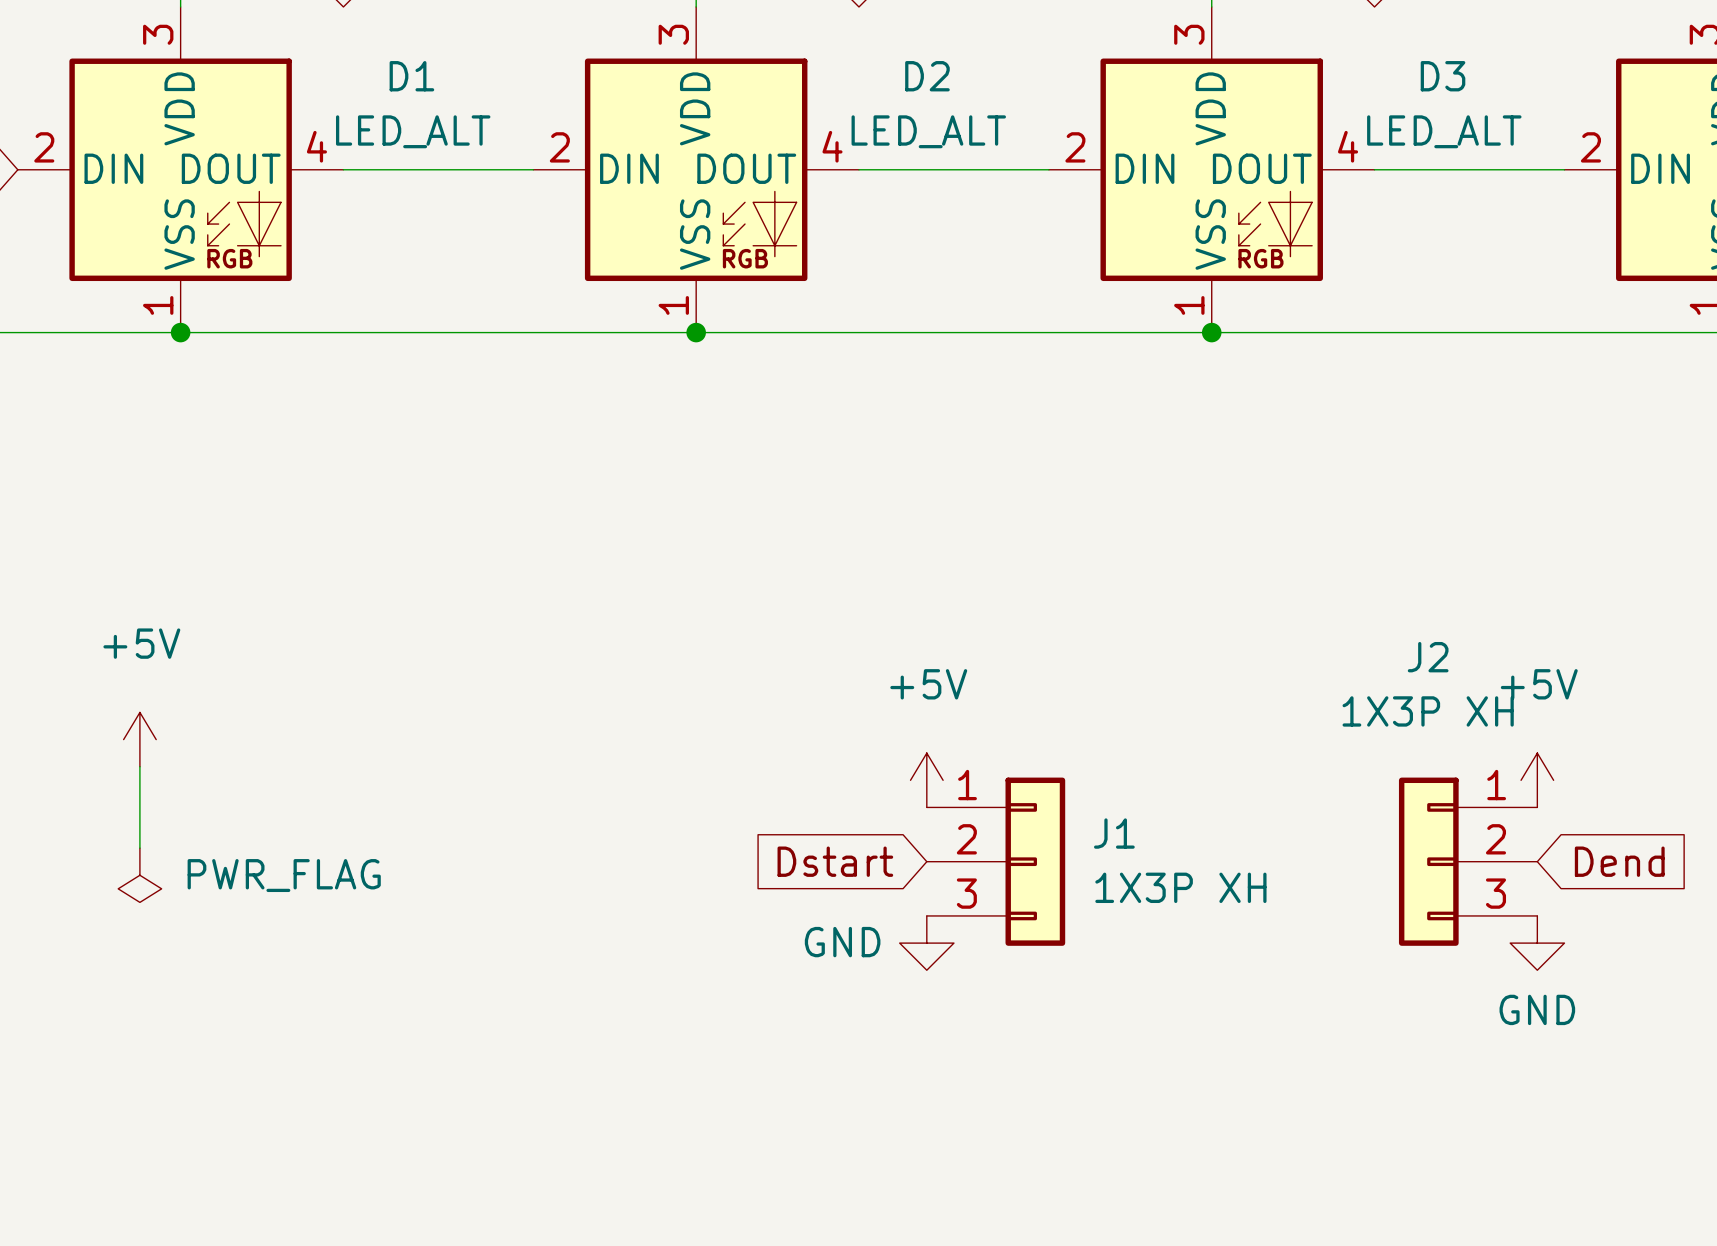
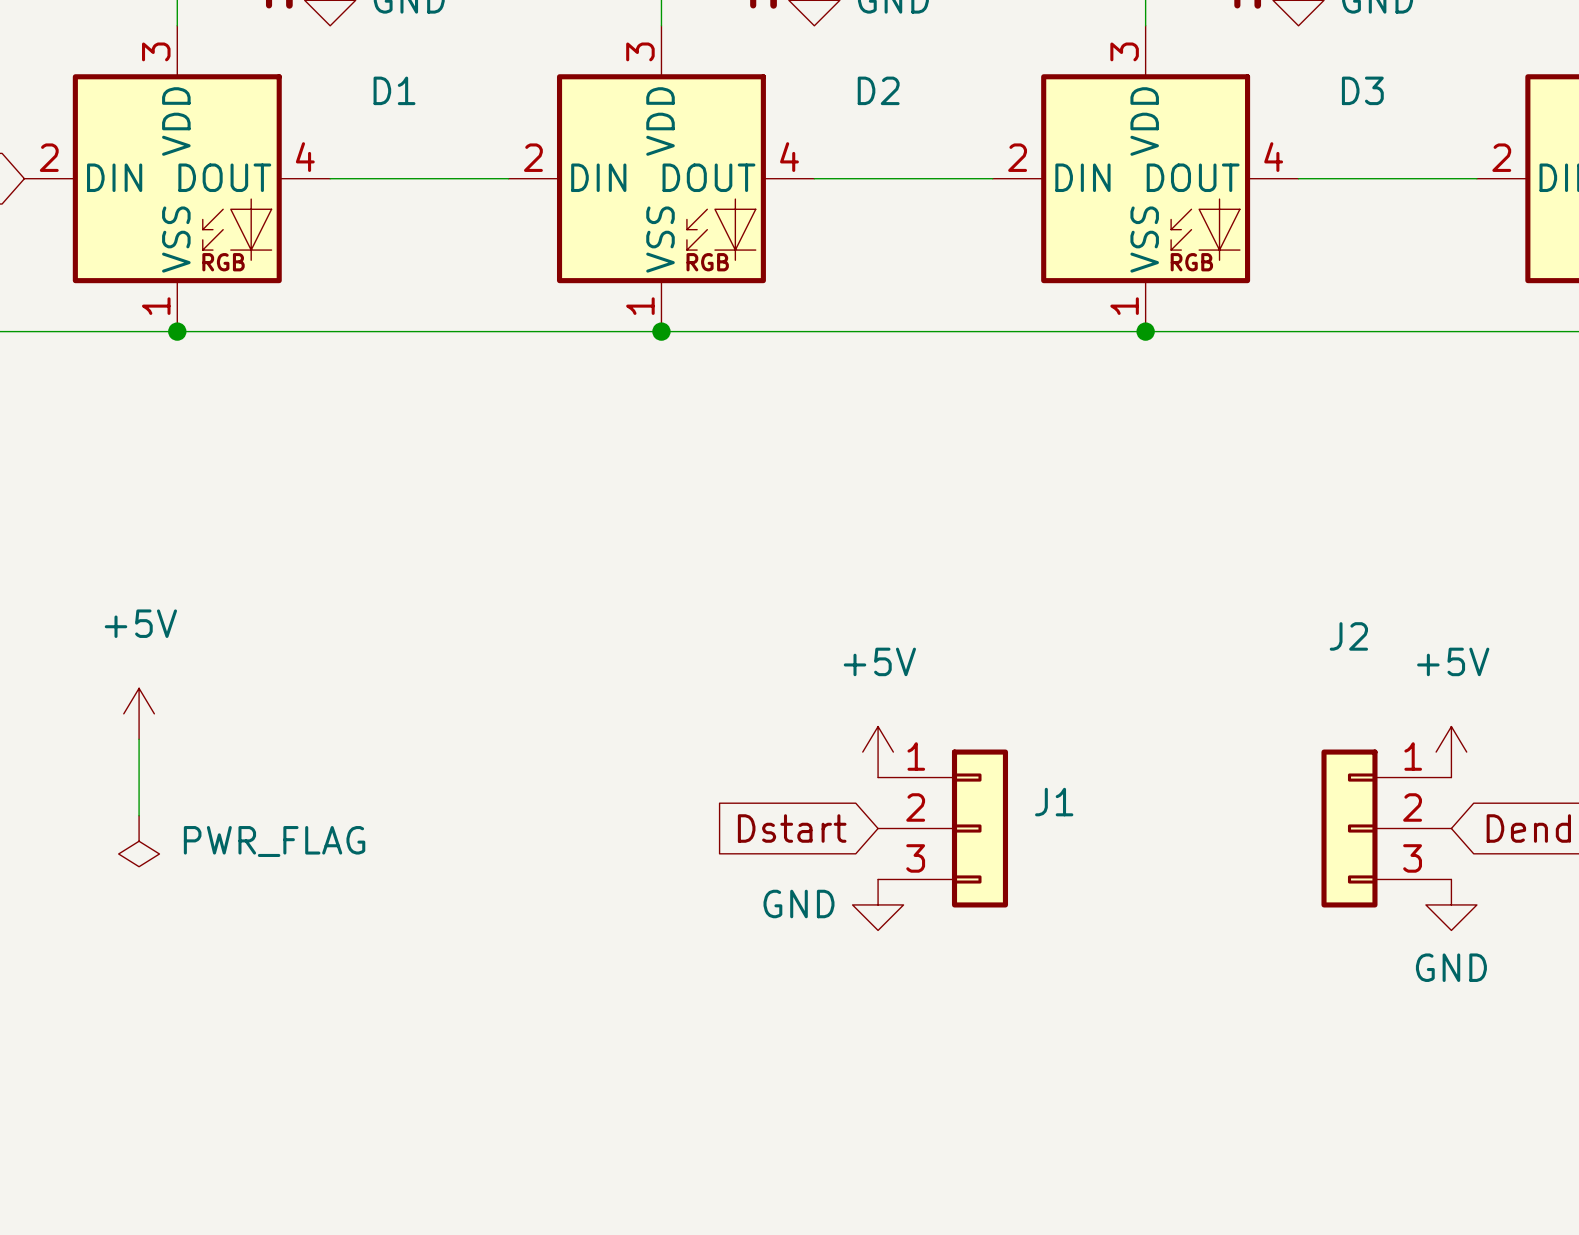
D1 value: LED_ALT (413, 131) -> none
D2 value: LED_ALT (928, 131) -> none
D3 value: LED_ALT (1444, 131) -> none
J2 value: 1X3P XH (1428, 711) -> none
J1 value: 1X3P XH (1180, 887) -> none

